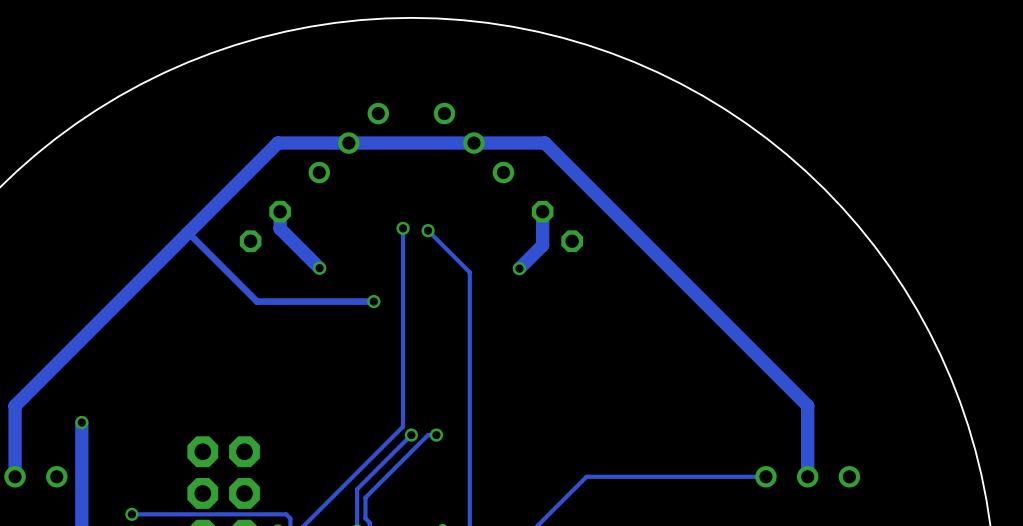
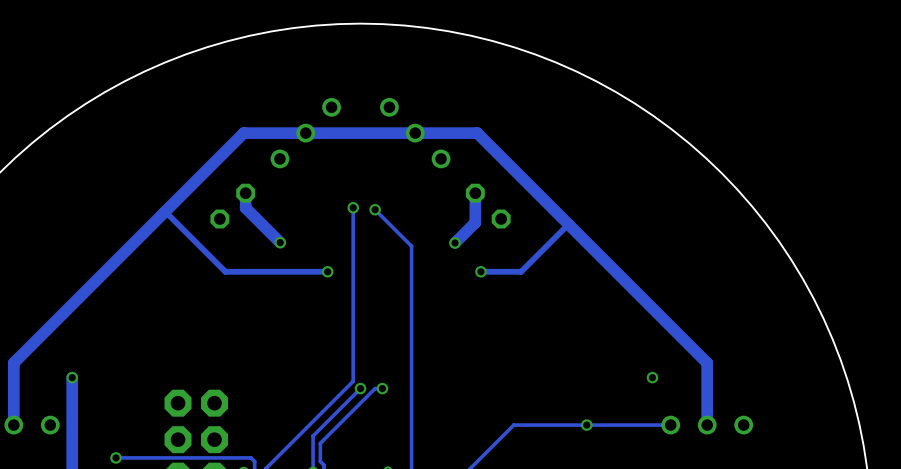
track: none -> (568, 224) (521, 271) (480, 271)
via: none -> (480, 271)
via: none -> (652, 377)
via: none -> (586, 425)

